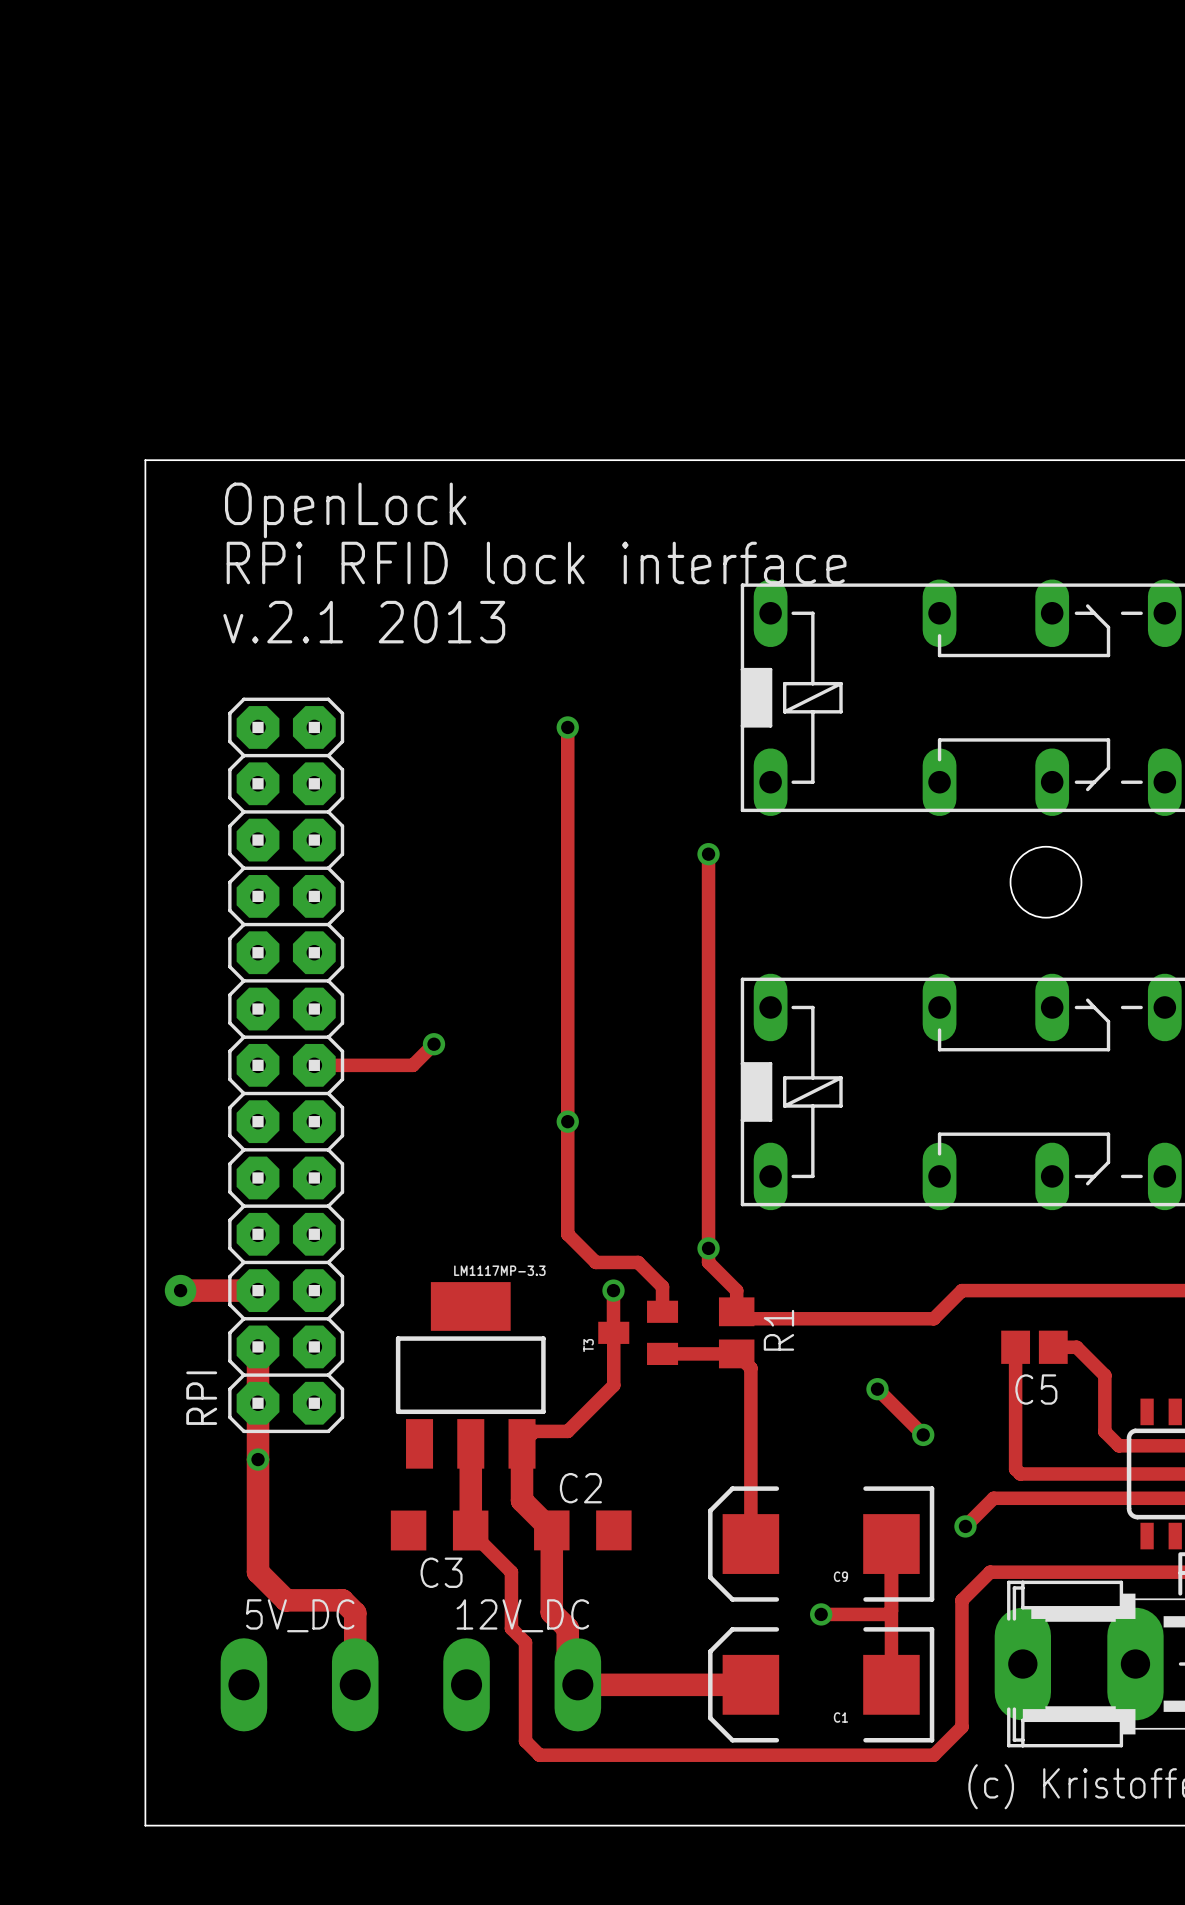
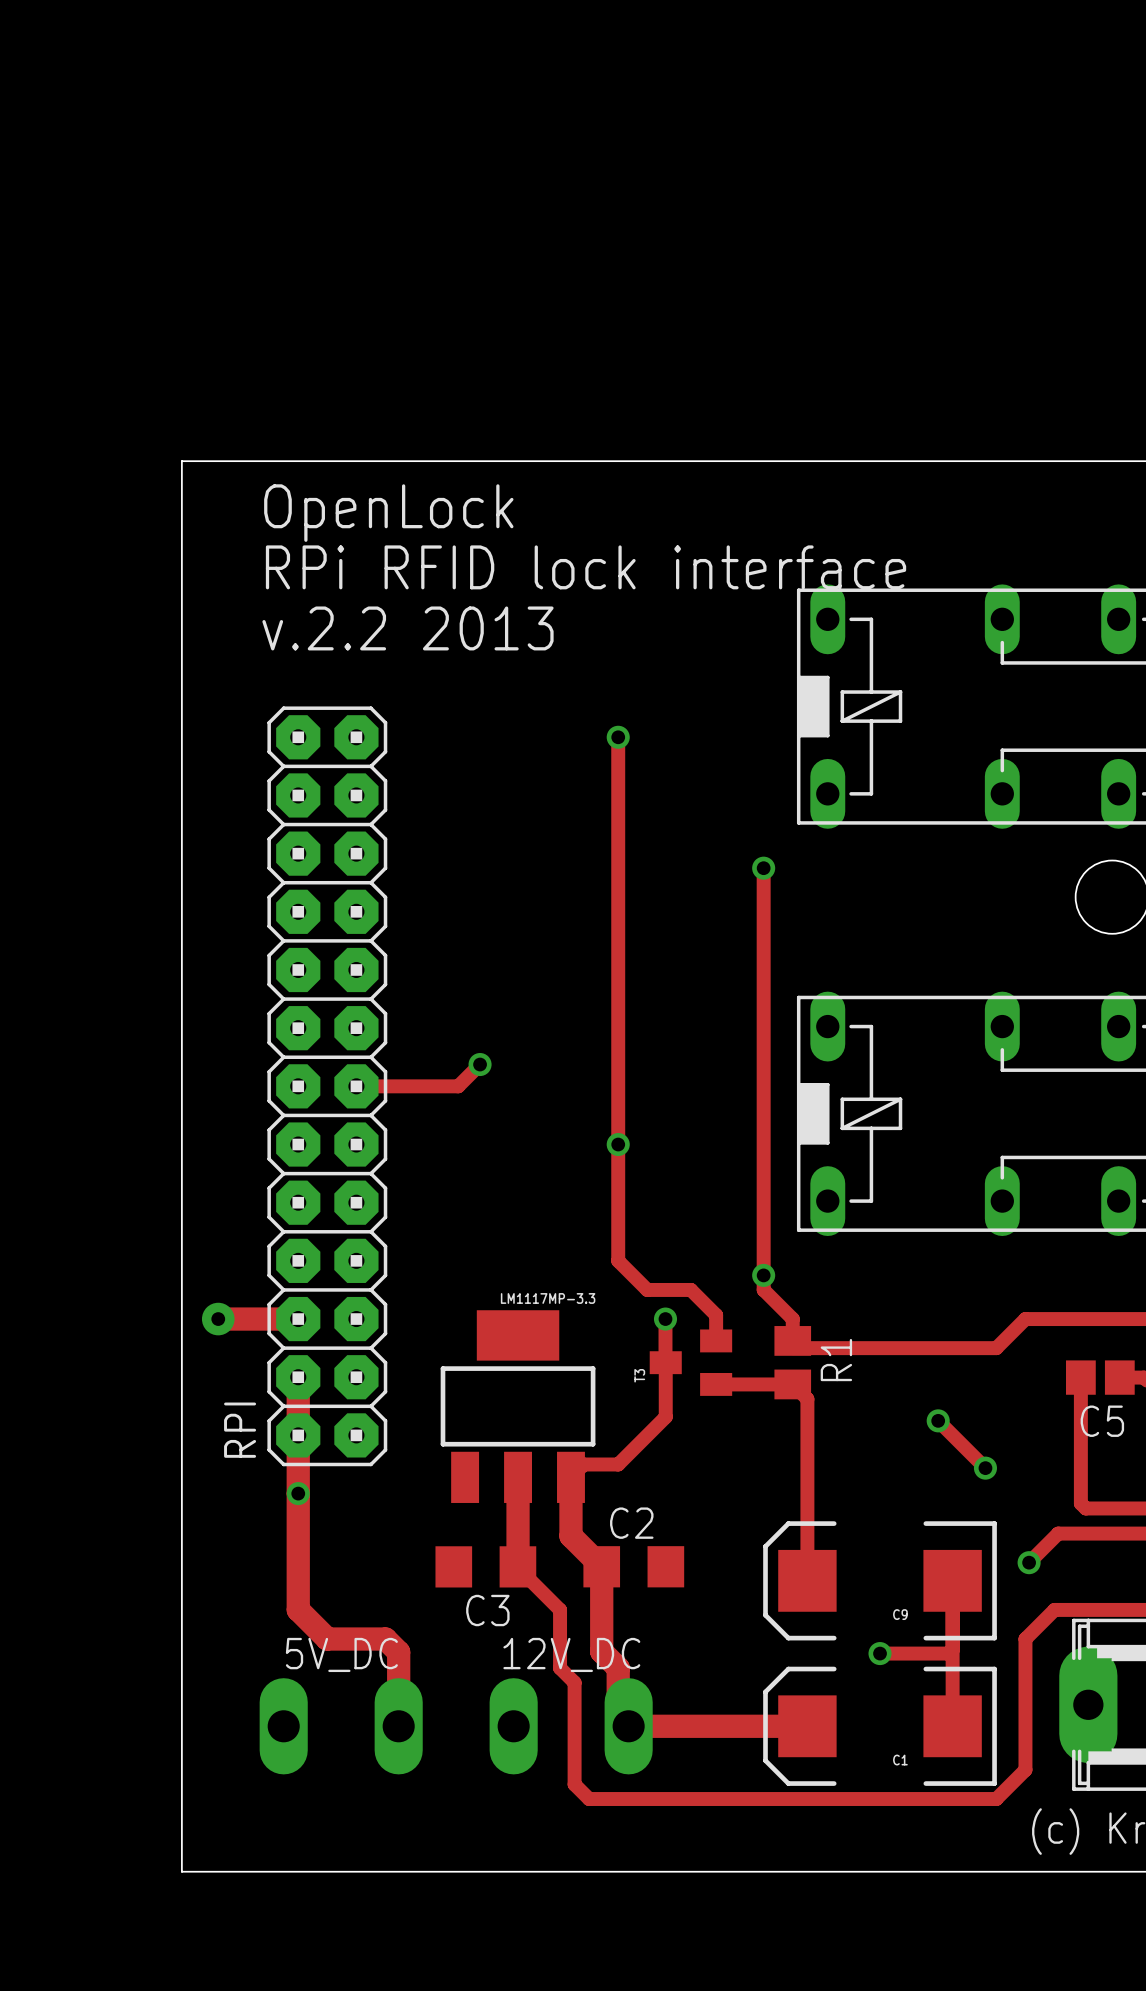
text: v.2.1 2013 (364, 622) -> v.2.2 2013 (408, 628)

